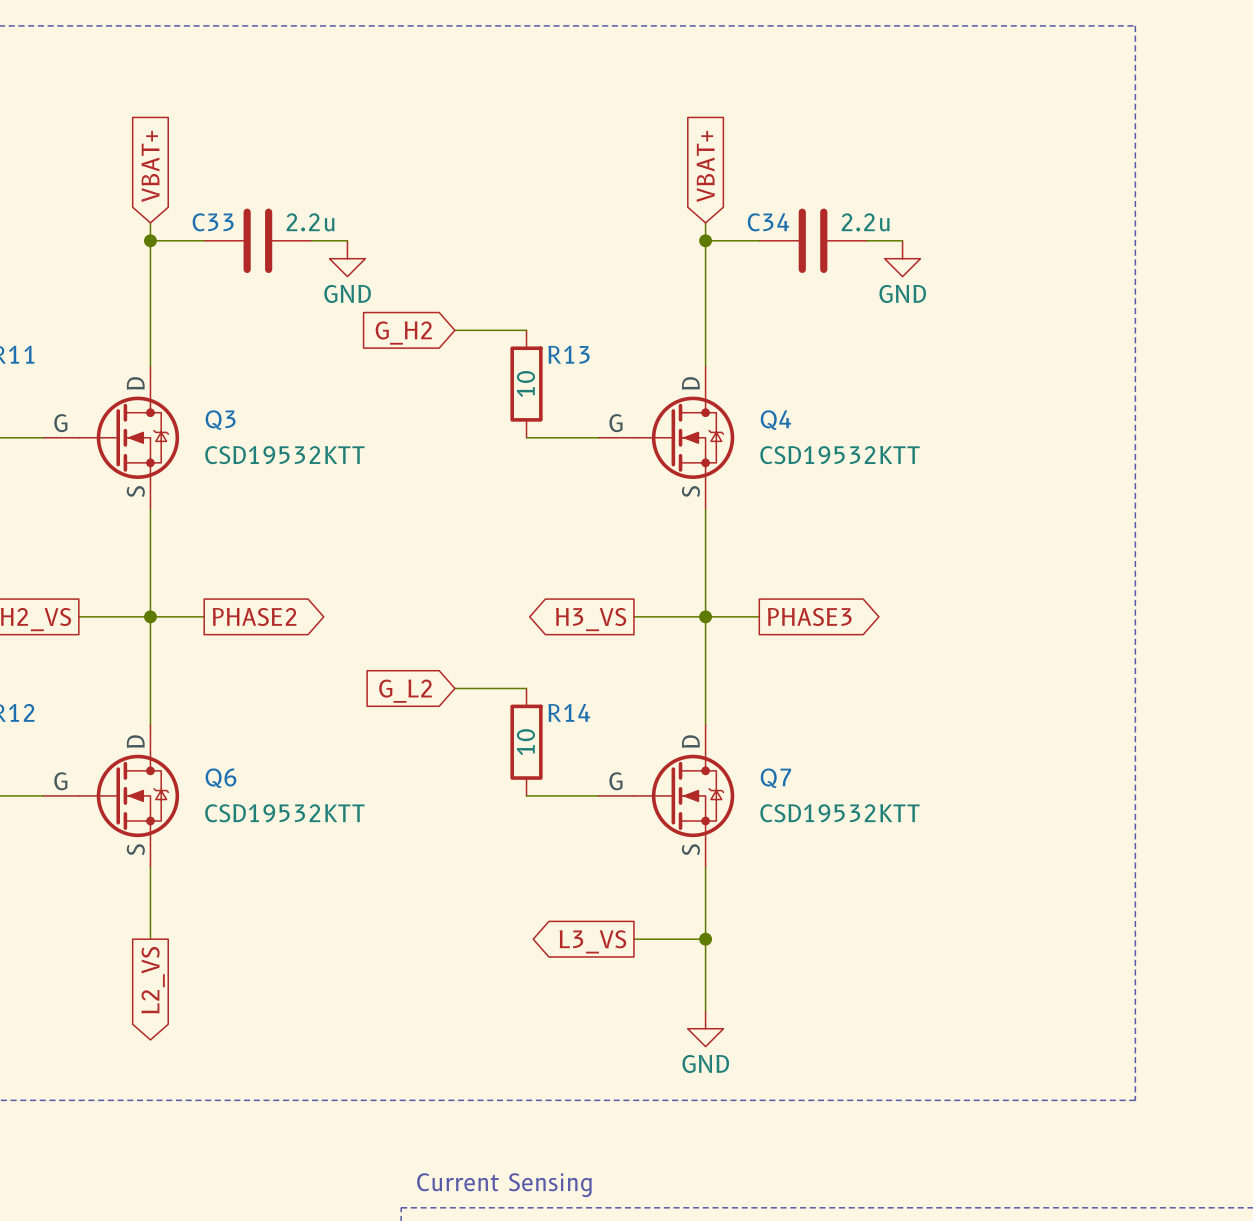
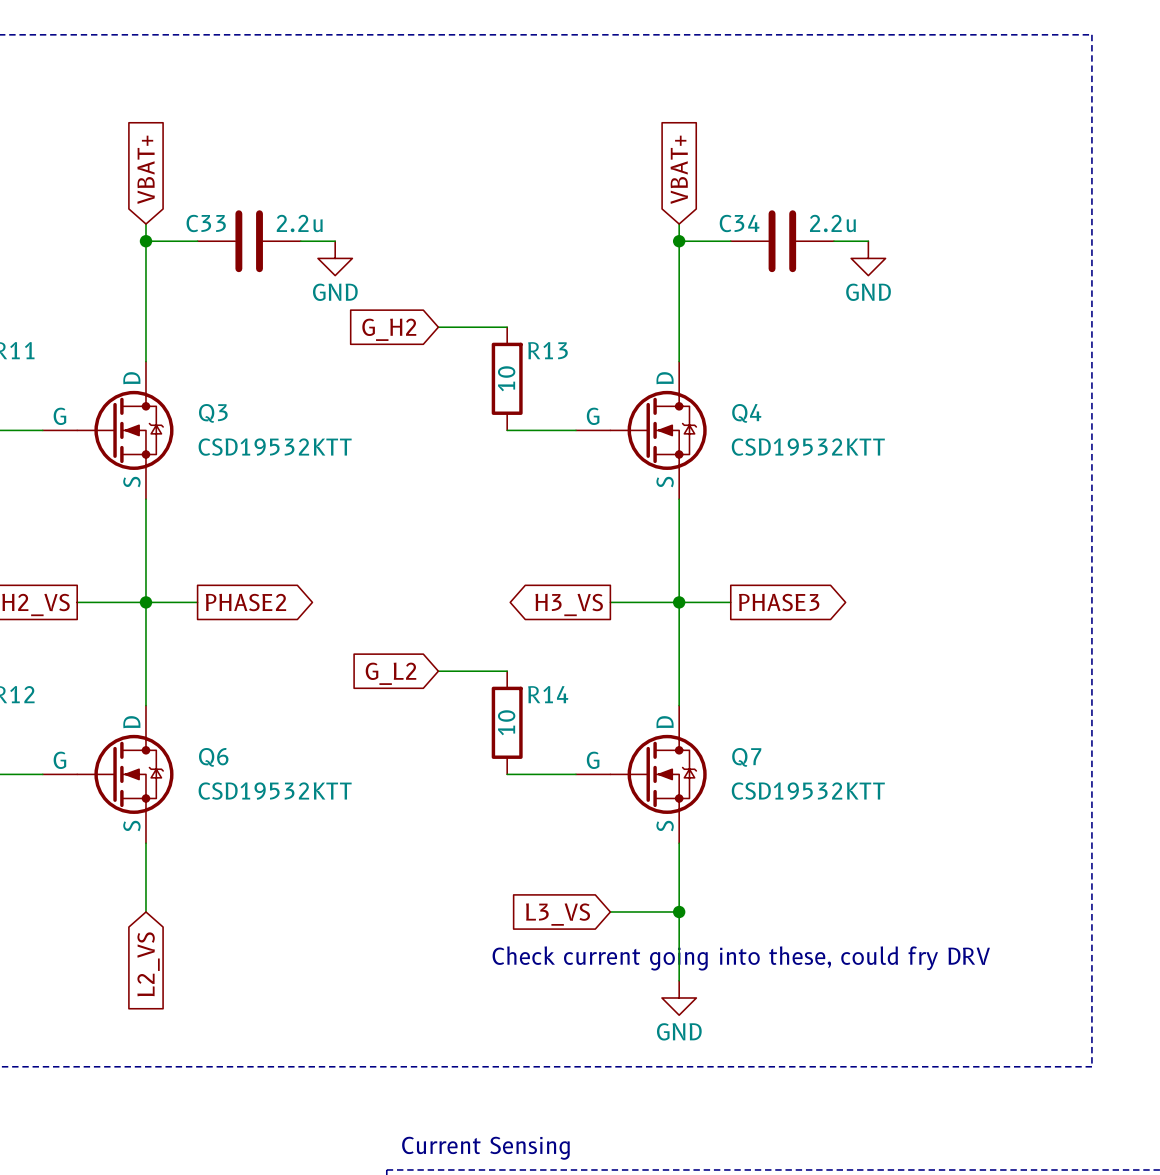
global label shape: output (592, 941) -> input (558, 914)
global label shape: output (153, 980) -> input (148, 964)
text: none -> Check current going into these, could fry DRV (741, 958)

